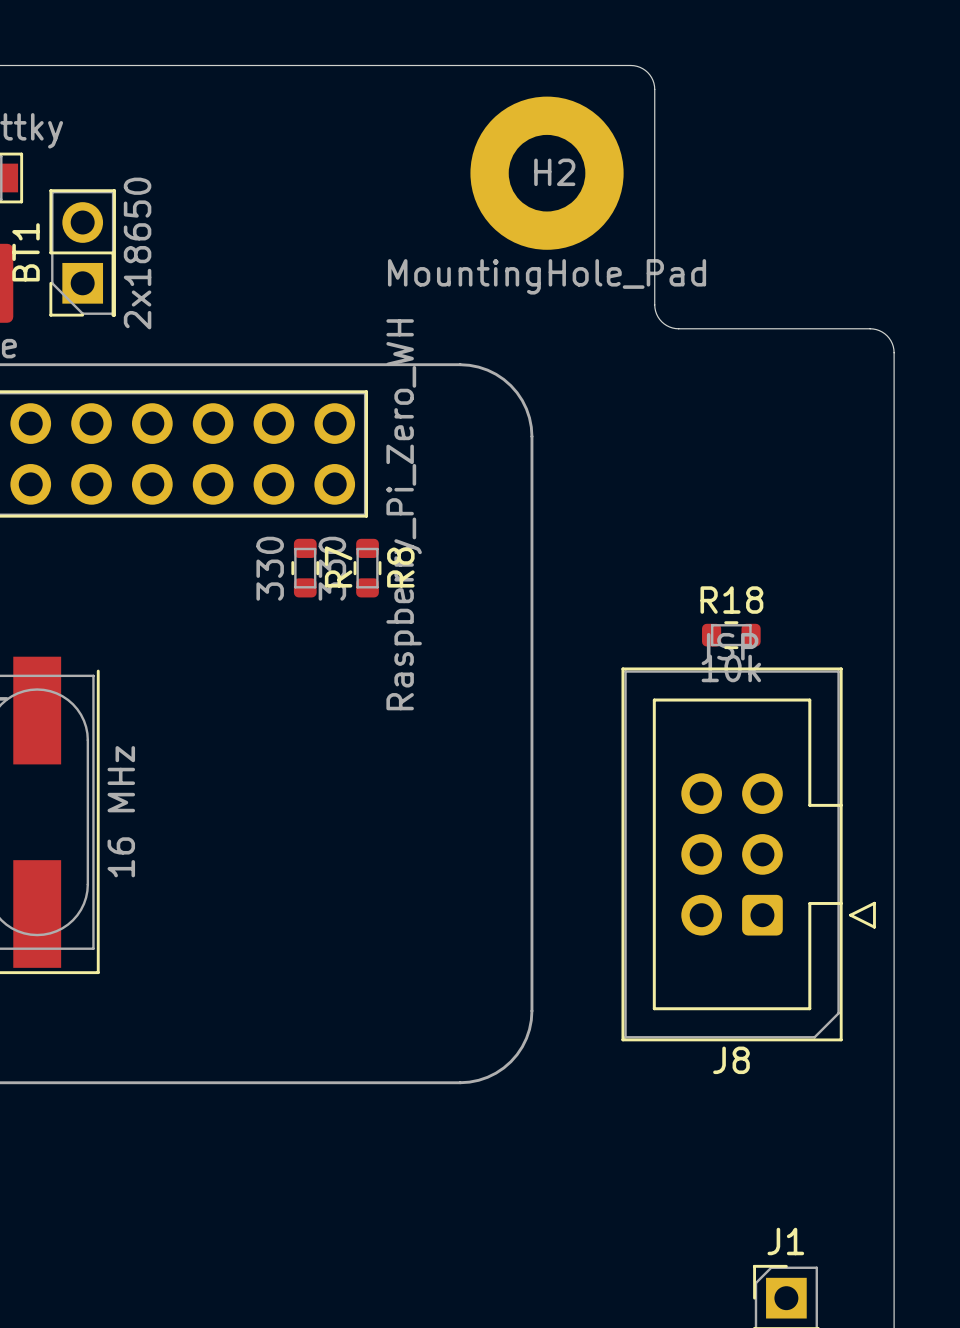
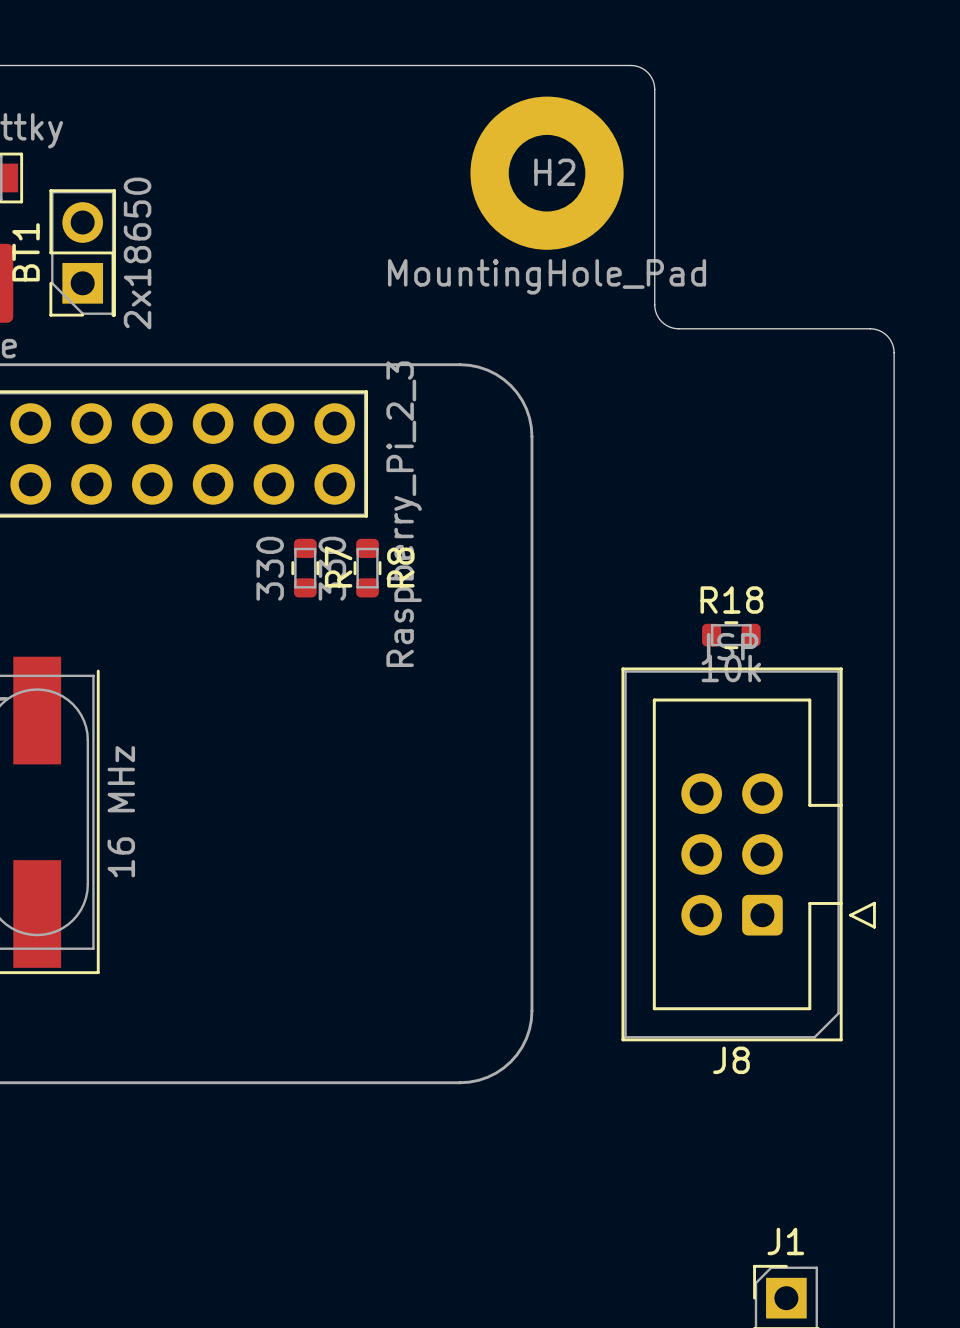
part value: Raspberry_Pi_Zero_WH (404, 514) -> Raspberry_Pi_2_3 (404, 514)

